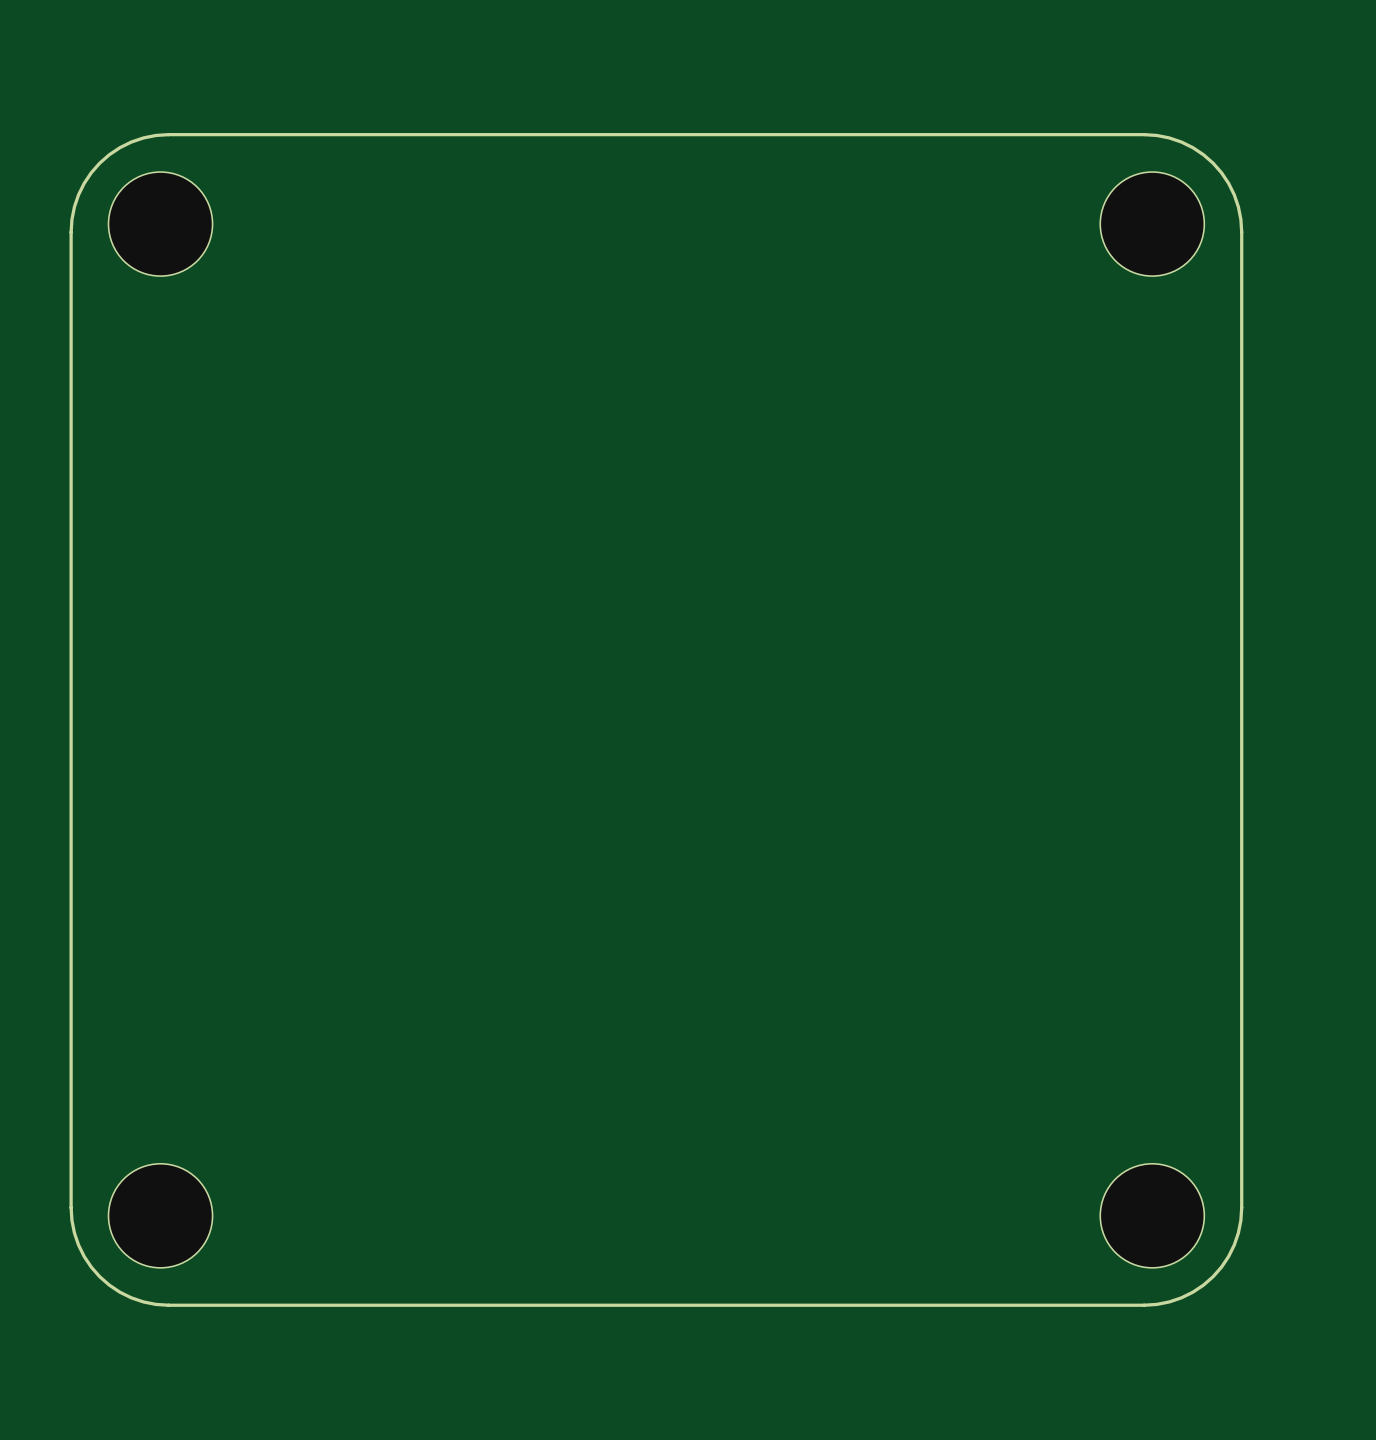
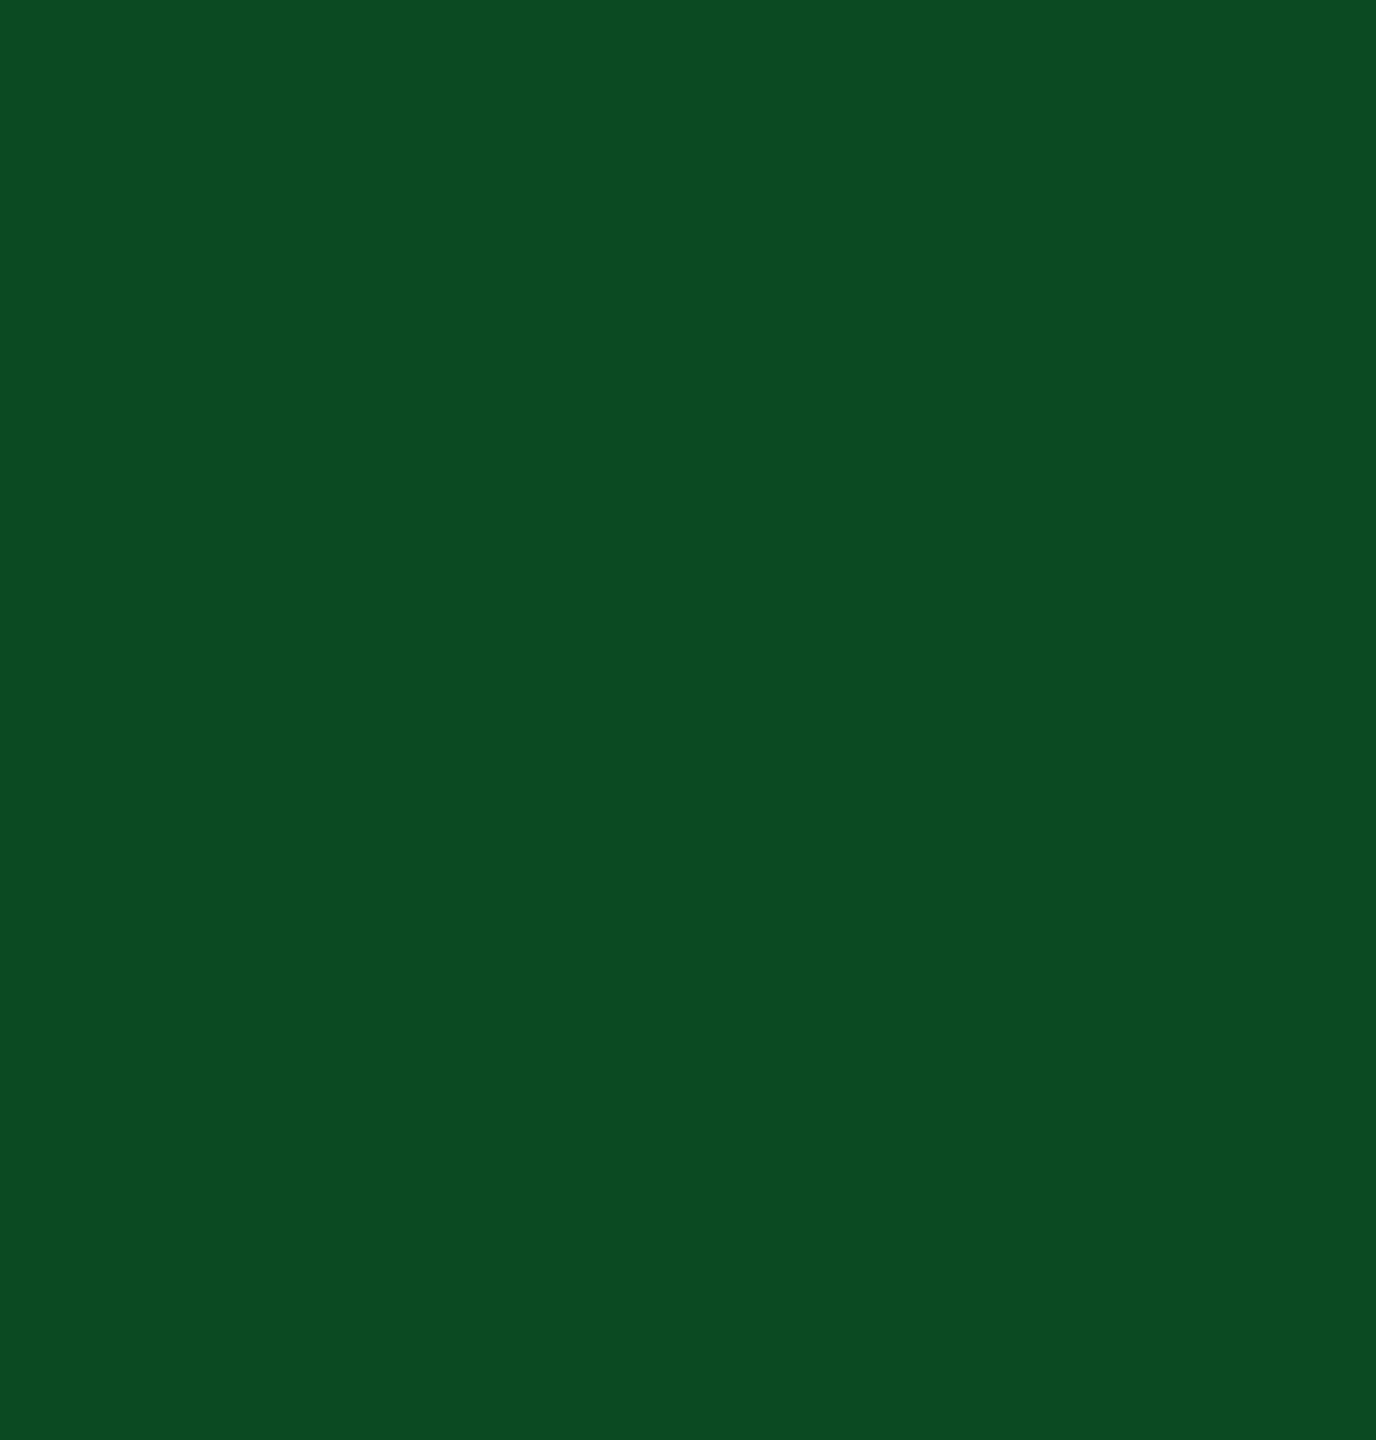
board edge: (1144, 134) (168, 134) (143, 137) (131, 142) (109, 154) (99, 163) (91, 172) (78, 194) (74, 206) (71, 232) (71, 1207) (74, 1232) (78, 1245) (91, 1267) (99, 1276) (109, 1285) (131, 1297) (143, 1301) (168, 1305) (1144, 1305) (1169, 1301) (1181, 1297) (1203, 1285) (1213, 1276) (1221, 1267) (1234, 1245) (1238, 1232) (1241, 1207) (1241, 232) (1238, 206) (1234, 194) (1221, 172) (1213, 163) (1203, 154) (1181, 142) (1169, 137) (1144, 134) -> none
part: (160, 224) -> none
part: (1152, 224) -> none
part: (160, 1215) -> none
part: (1152, 1215) -> none

